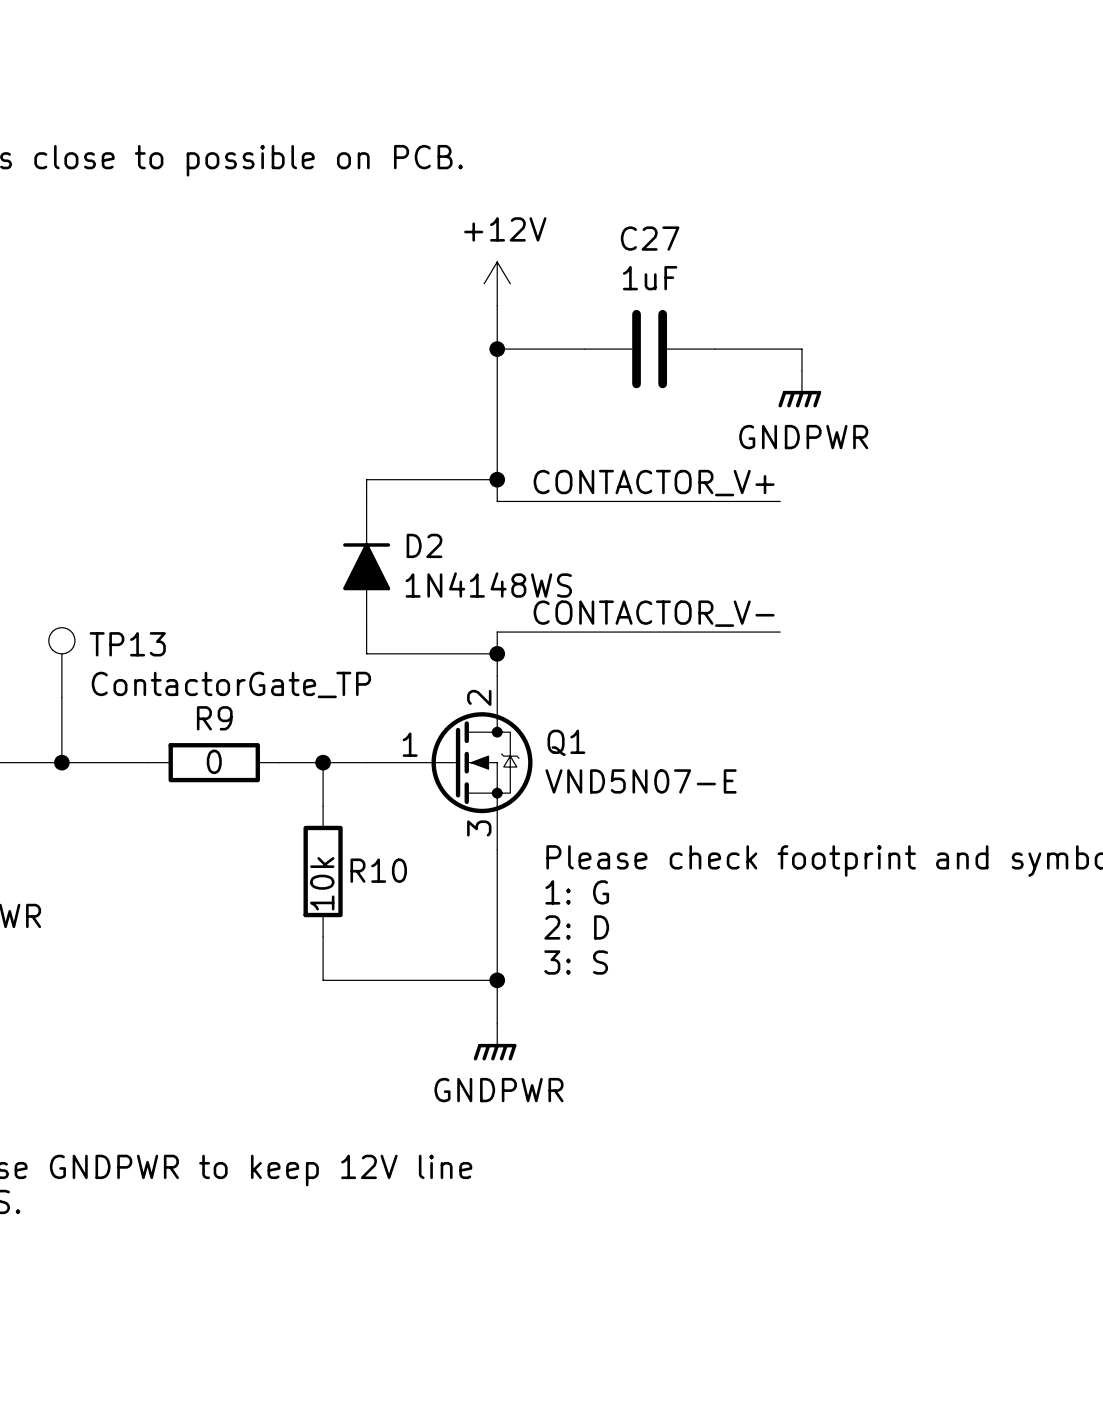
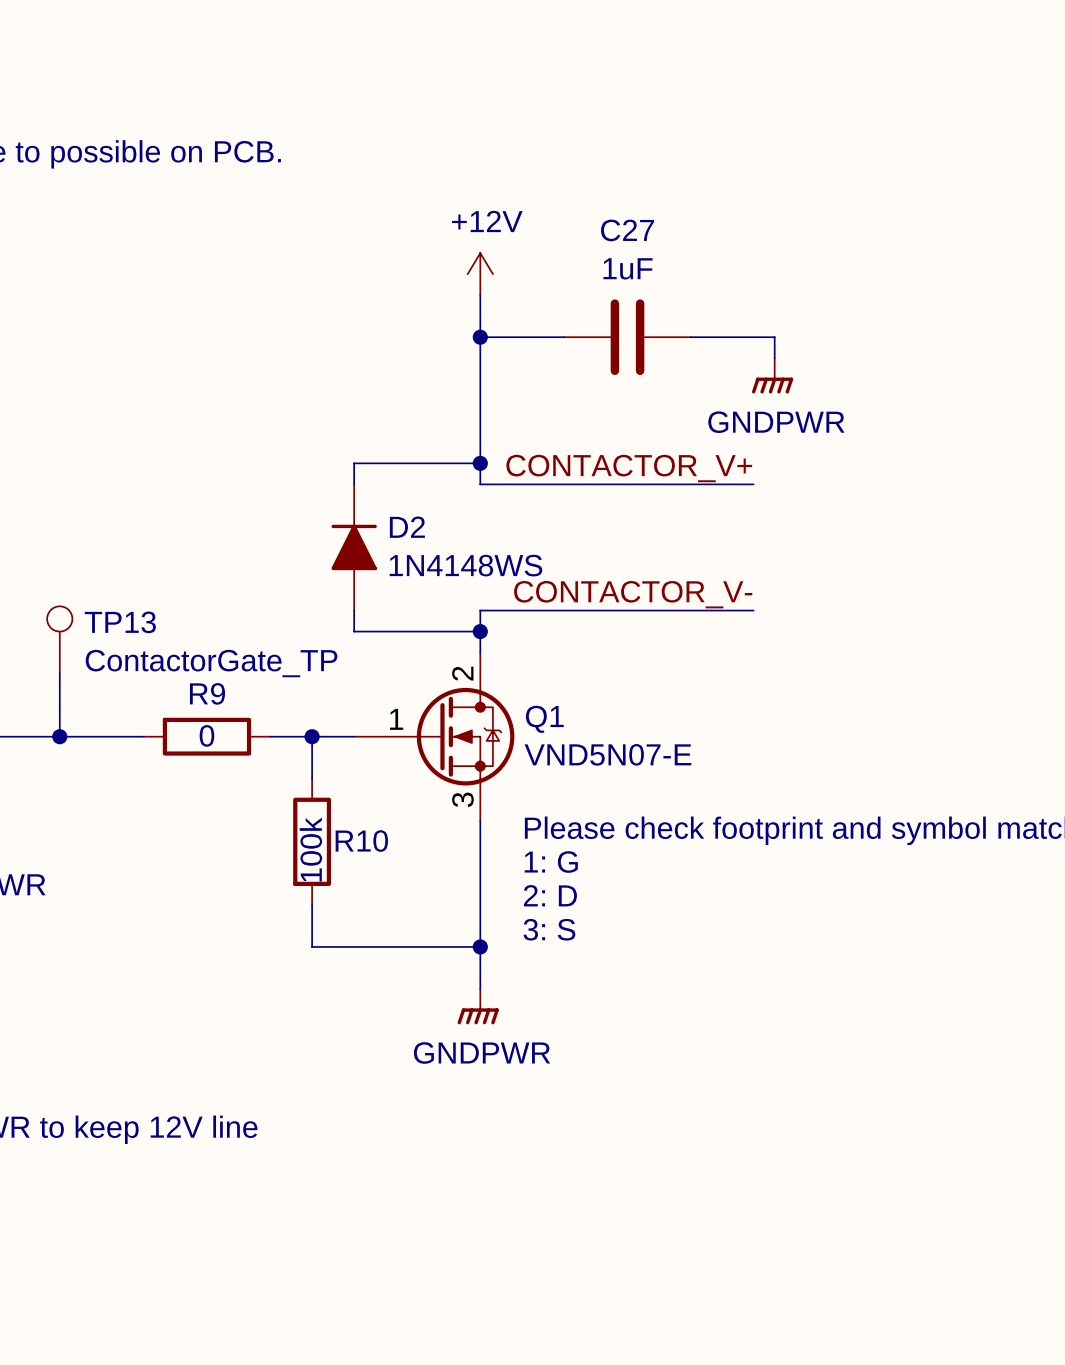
R10 value: 10k (322, 883) -> 100k (310, 849)

